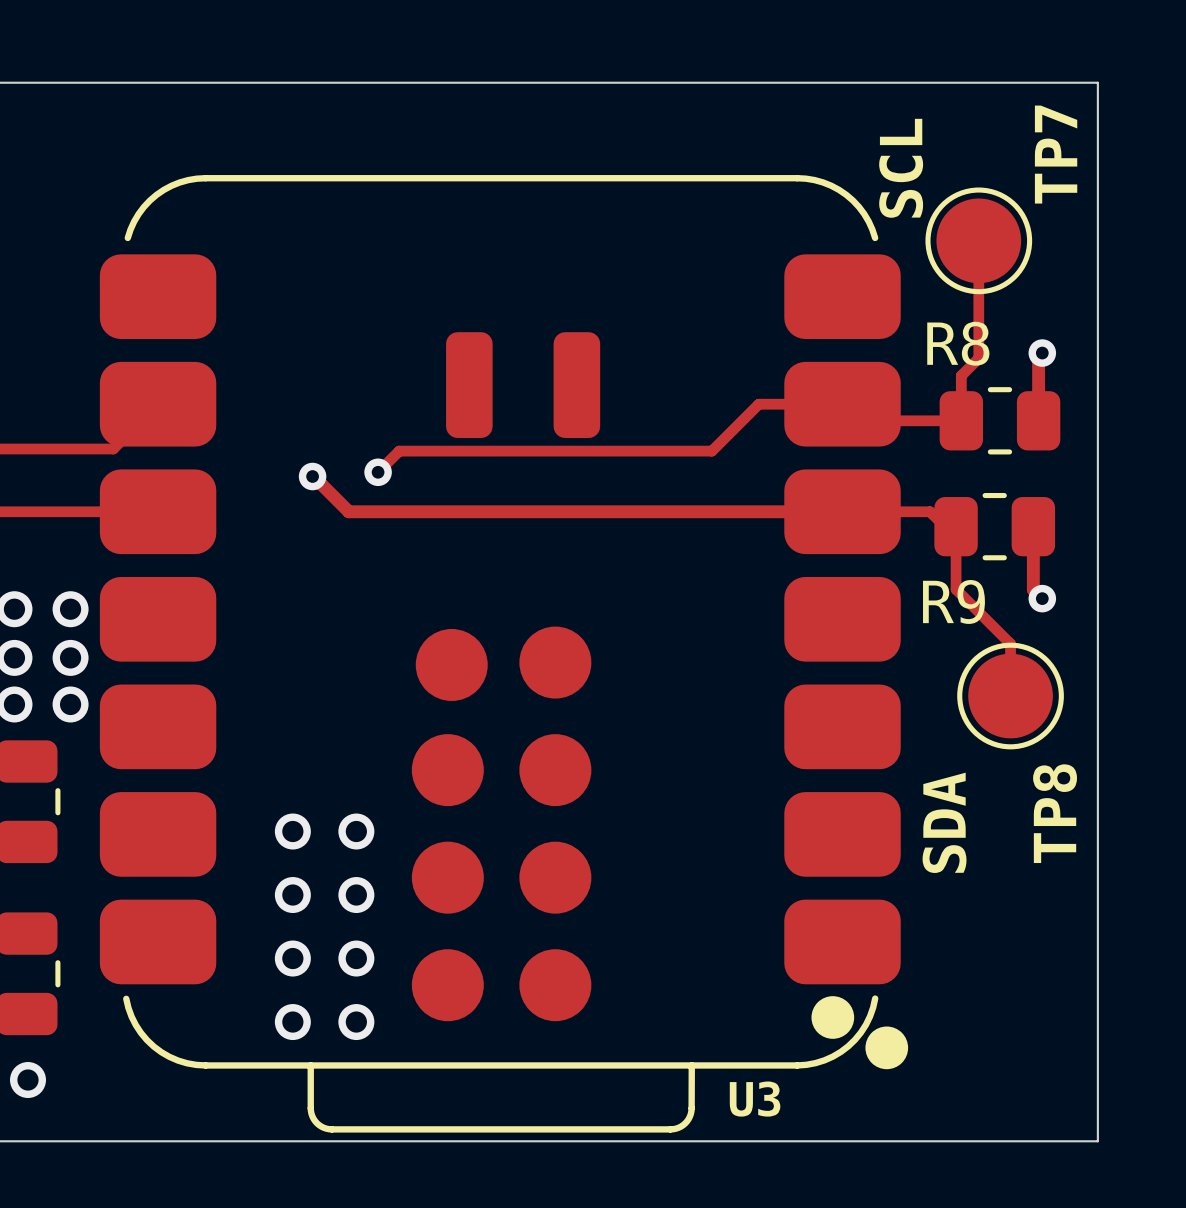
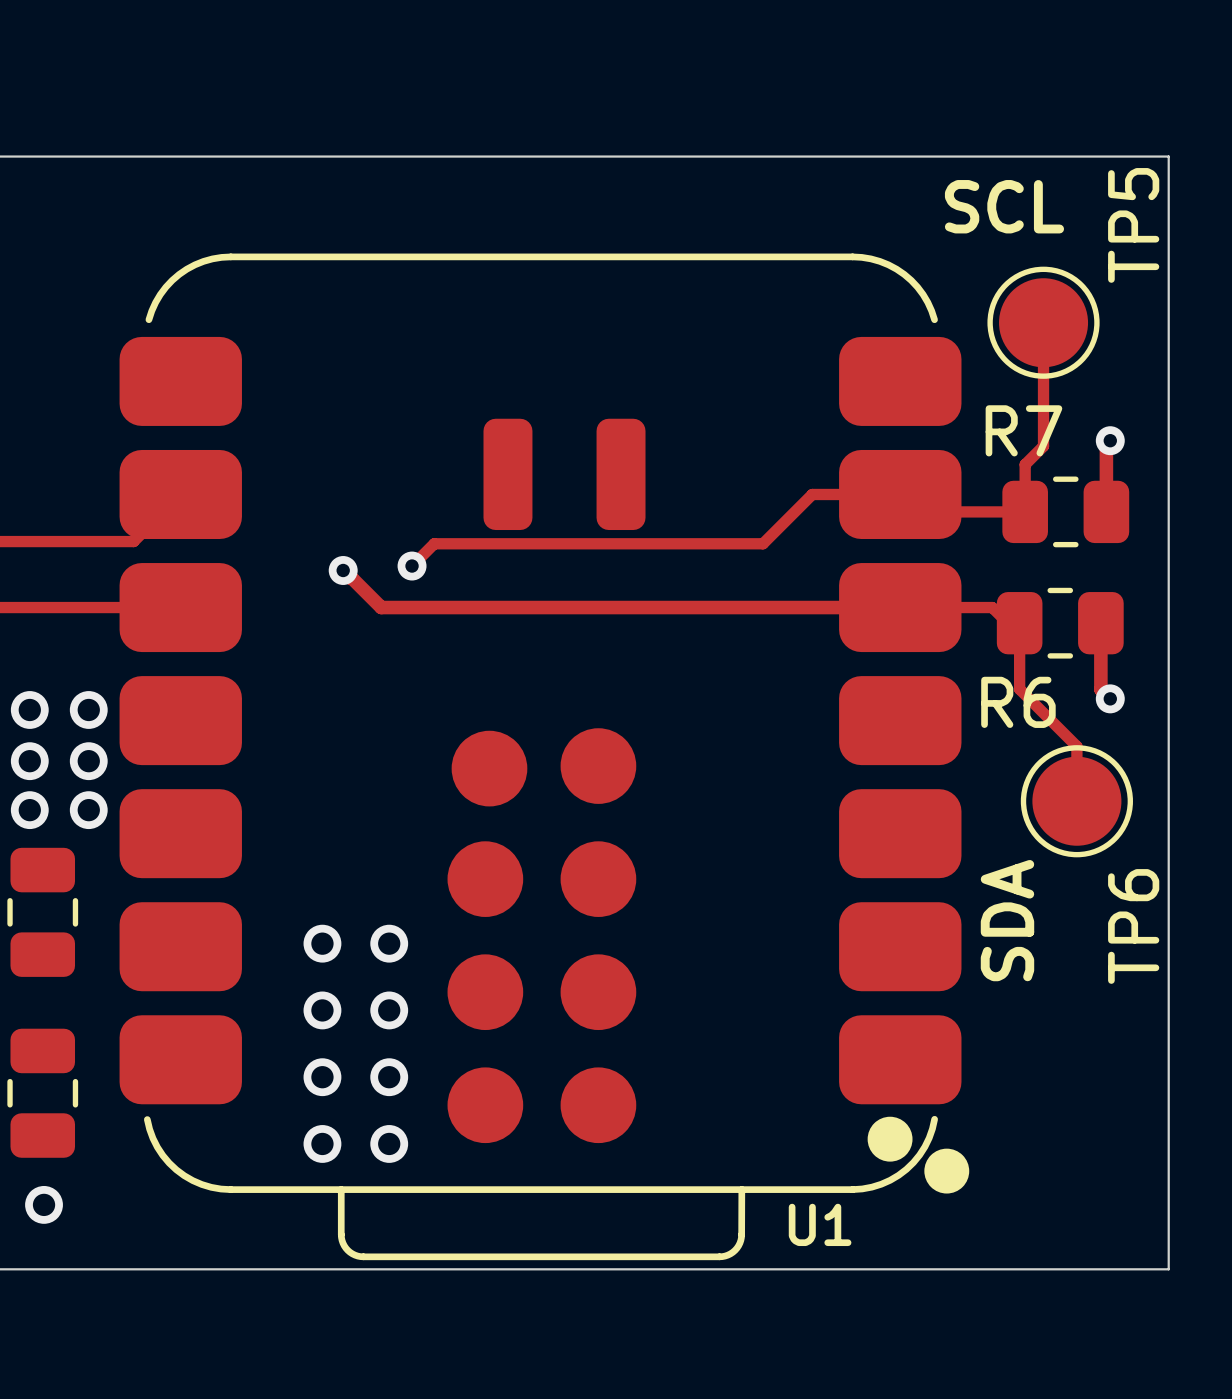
TP7 name: TP7 (1056, 154) -> TP5 (1133, 225)
text rotation: 0° (901, 168) -> 90° clockwise (1004, 206)
R8 name: R8 (958, 343) -> R7 (1023, 430)
R9 name: R9 (953, 601) -> R6 (1018, 702)
TP8 name: TP8 (1055, 813) -> TP6 (1133, 926)
U3 name: U3 (755, 1099) -> U1 (820, 1224)

